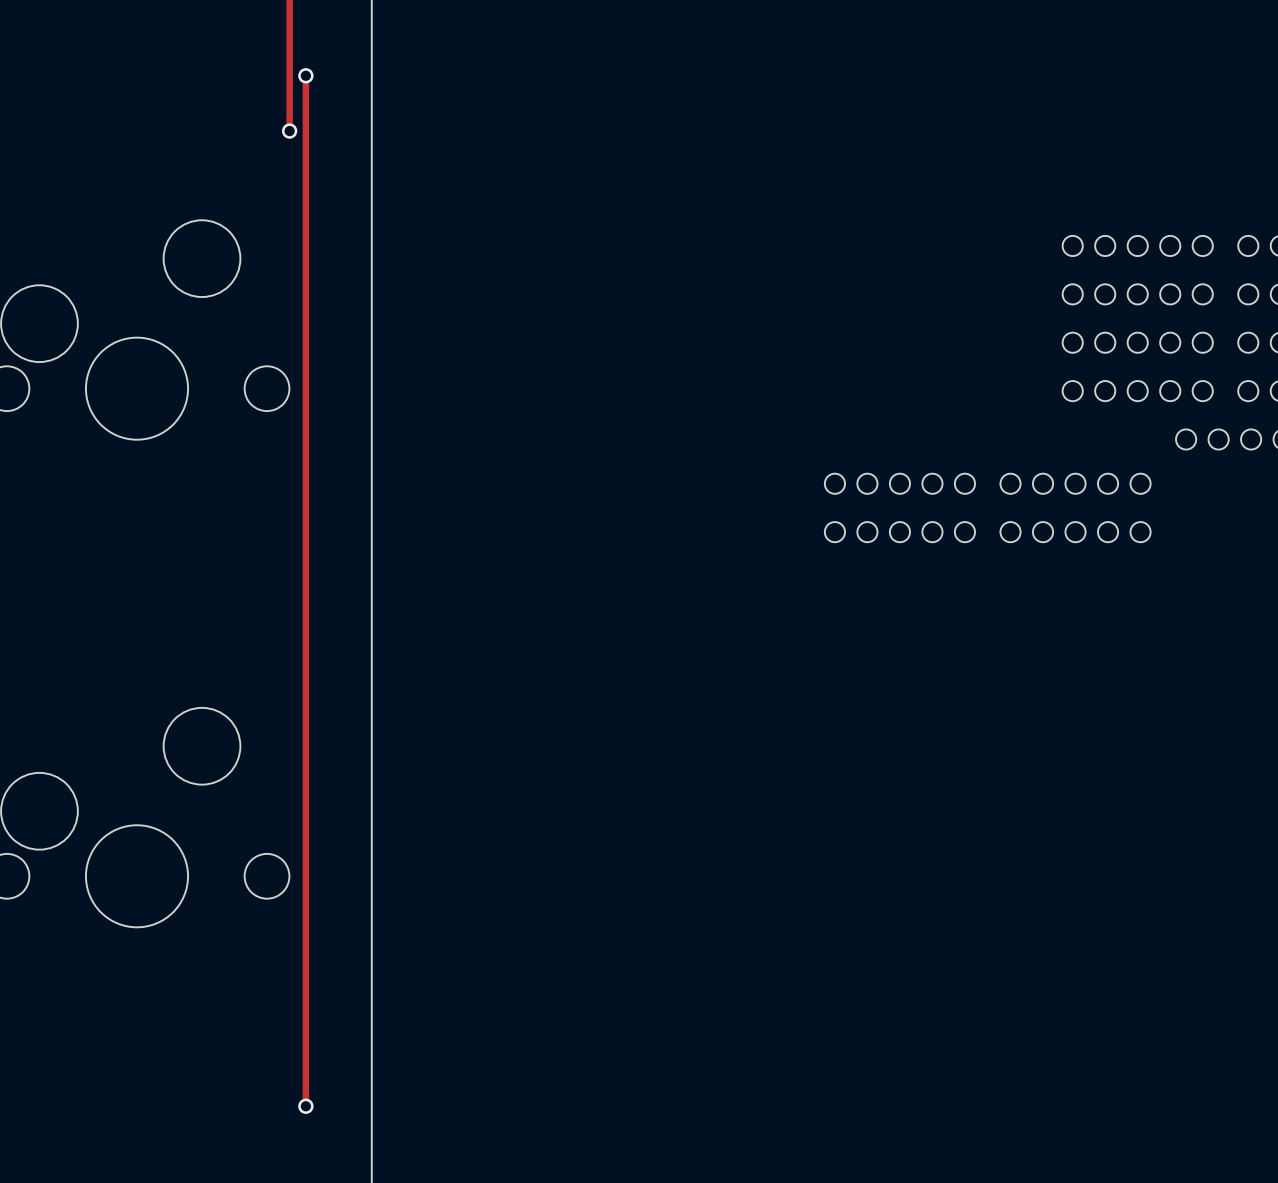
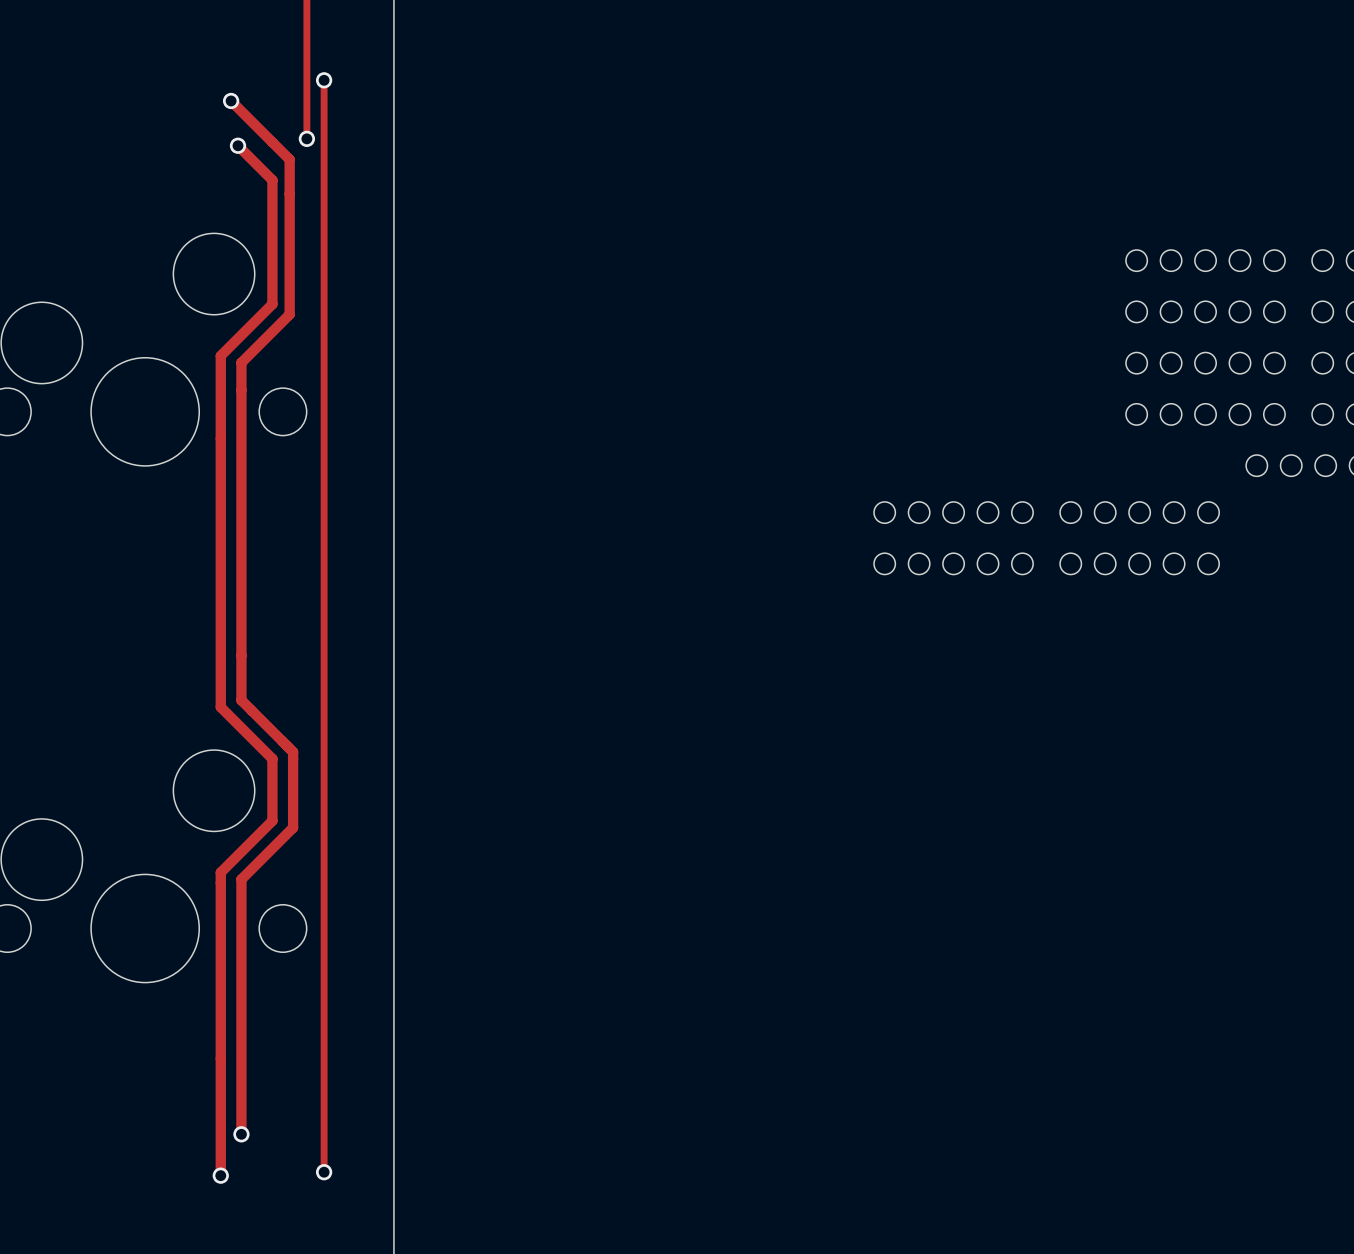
track: none -> (231, 100) (289, 159) (289, 314) (241, 362) (241, 700) (293, 751) (293, 827) (241, 879) (241, 1134)
via: none -> (231, 100)
track: none -> (237, 145) (272, 180) (272, 304) (220, 355) (220, 707) (272, 758) (272, 820) (220, 872) (220, 1175)
via: none -> (237, 145)
via: none -> (241, 1134)
via: none -> (220, 1175)

